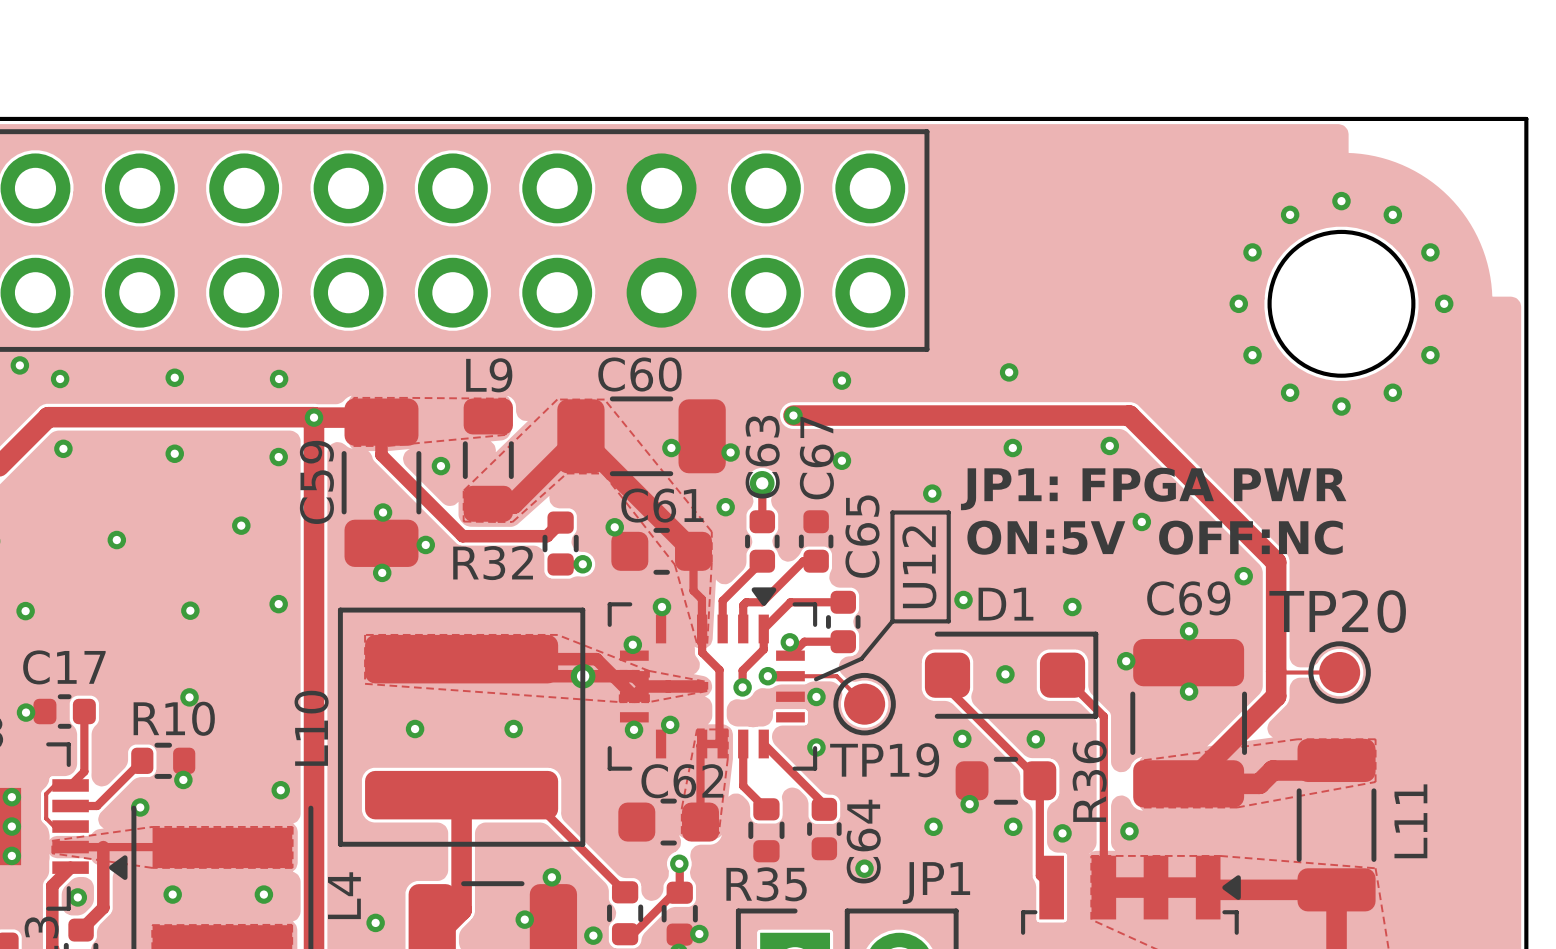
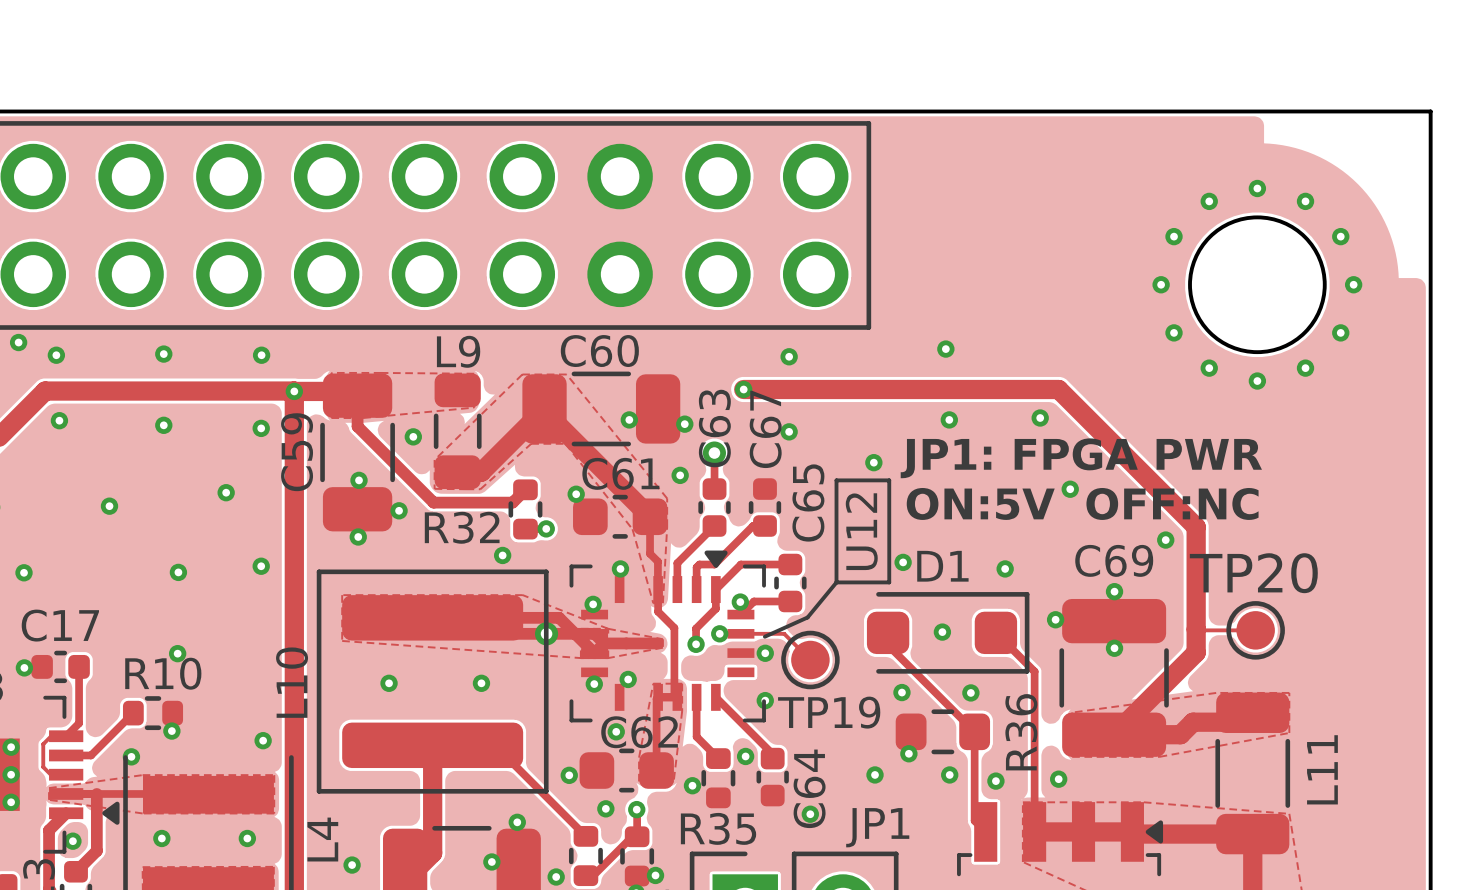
via: none -> (502, 555)
via: none -> (616, 731)
via: none -> (745, 756)
via: none -> (569, 775)
via: none -> (692, 785)
via: none -> (605, 808)

